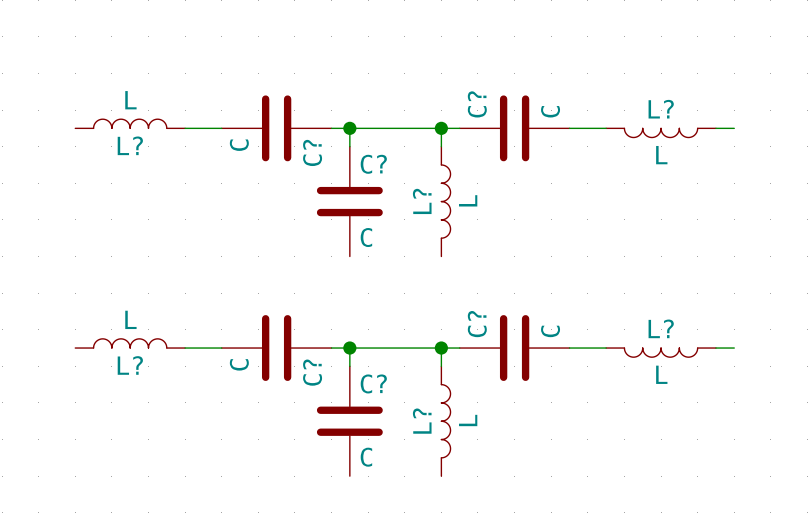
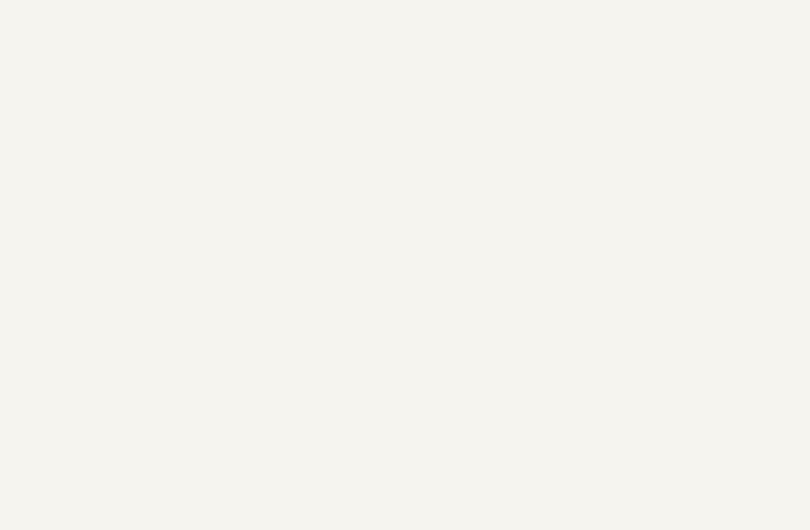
L?: L (130, 123) -> none
wire: (185, 128) (221, 128) -> none
C?: C (276, 128) -> none
wire: (331, 128) (459, 128) -> none
wire: (349, 128) (349, 146) -> none
junction: (349, 128) -> none
wire: (441, 128) (441, 146) -> none
junction: (441, 128) -> none
C?: C (514, 128) -> none
wire: (569, 128) (606, 128) -> none
wire: (715, 128) (734, 128) -> none
L?: L (661, 132) -> none
C?: C (349, 201) -> none
L?: L (445, 201) -> none
L?: L (130, 343) -> none
wire: (185, 348) (221, 348) -> none
C?: C (276, 348) -> none
wire: (331, 348) (459, 348) -> none
wire: (349, 348) (349, 366) -> none
junction: (349, 348) -> none
wire: (441, 348) (441, 366) -> none
junction: (441, 348) -> none
C?: C (514, 348) -> none
wire: (569, 348) (606, 348) -> none
wire: (715, 348) (734, 348) -> none
L?: L (661, 352) -> none
C?: C (349, 421) -> none
L?: L (445, 421) -> none

